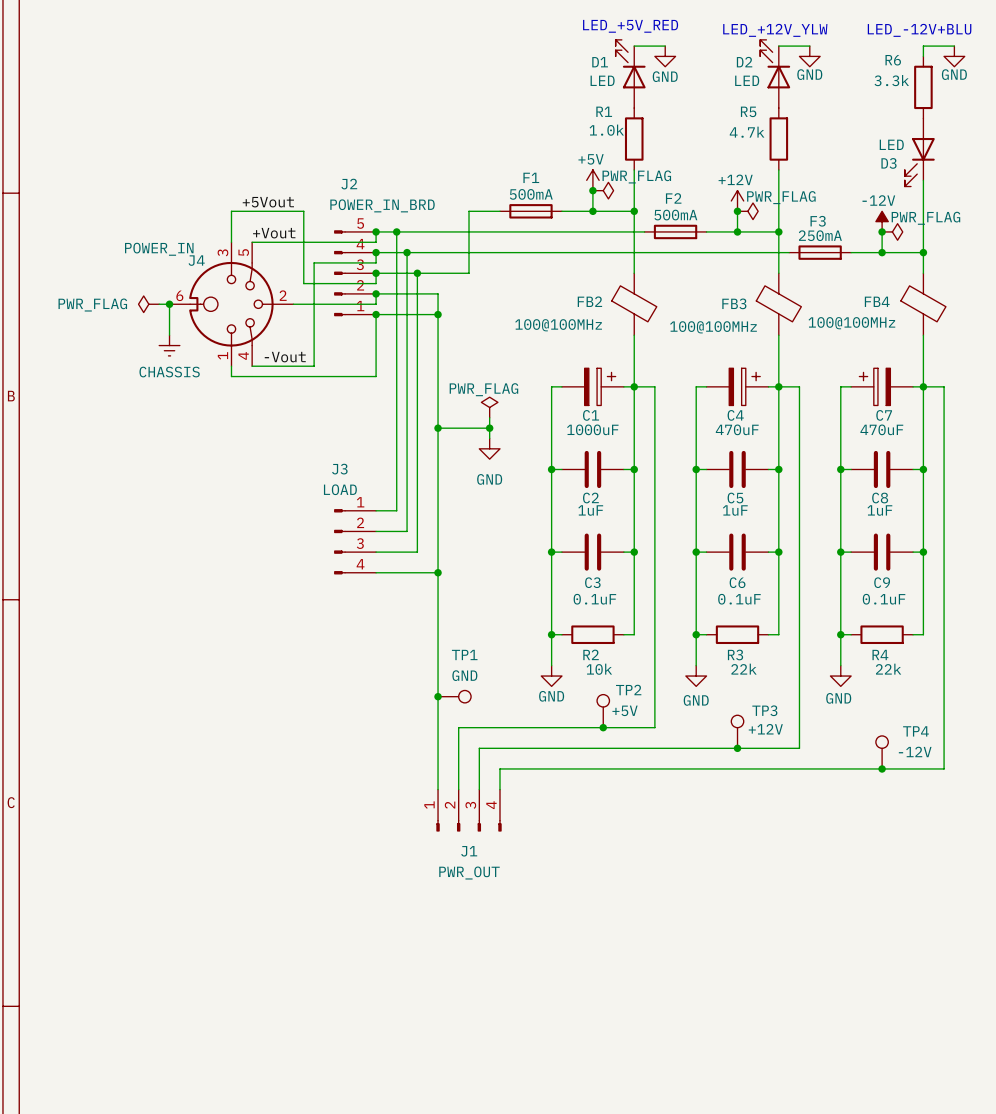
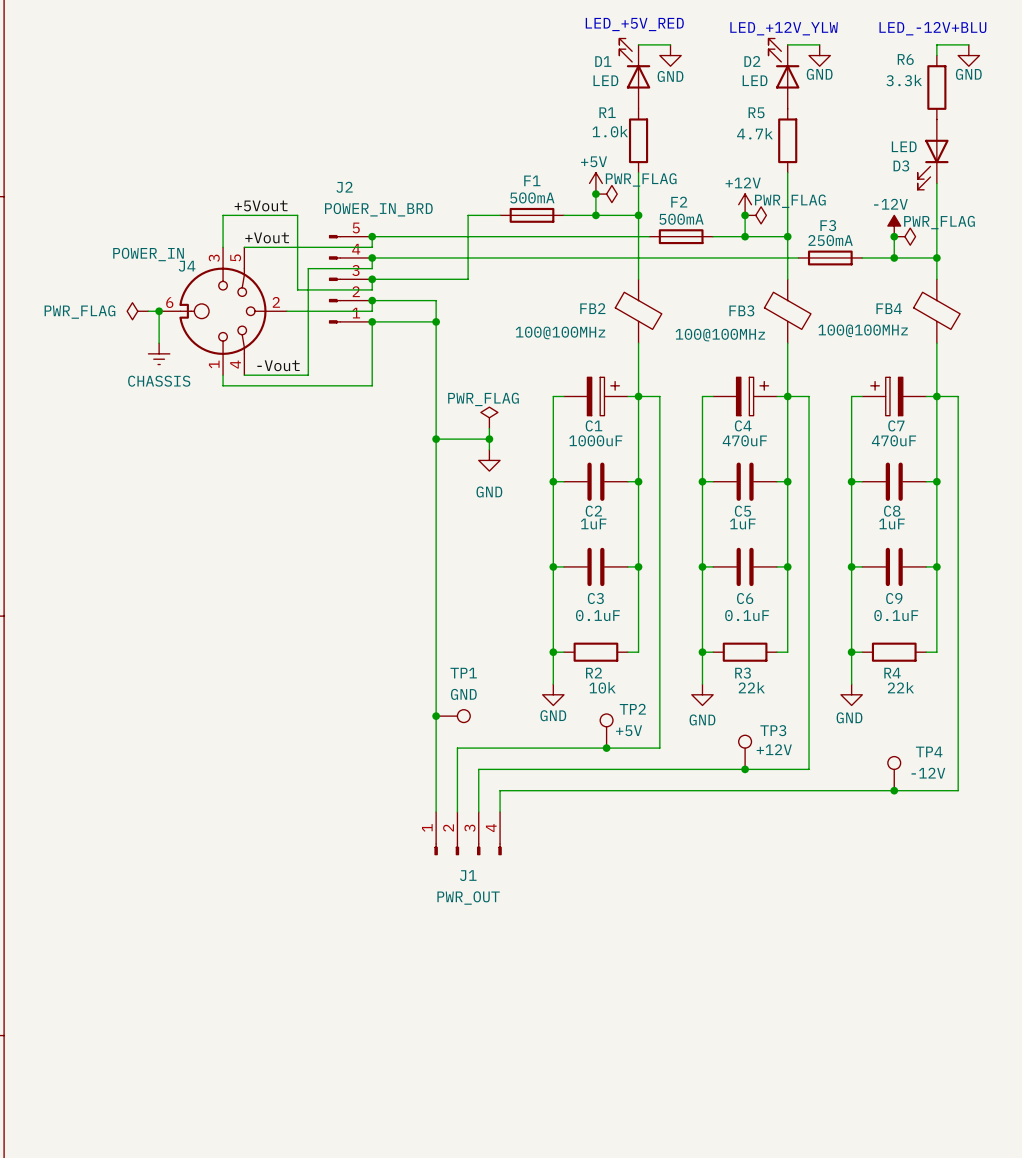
wire: (396, 231) (396, 510) (376, 510) -> none
junction: (396, 231) -> none
wire: (407, 252) (407, 531) (376, 531) -> none
junction: (407, 252) -> none
wire: (417, 273) (417, 552) (376, 552) -> none
junction: (417, 273) -> none
J3: LOAD (355, 541) -> none
wire: (376, 572) (438, 572) -> none
junction: (438, 572) -> none

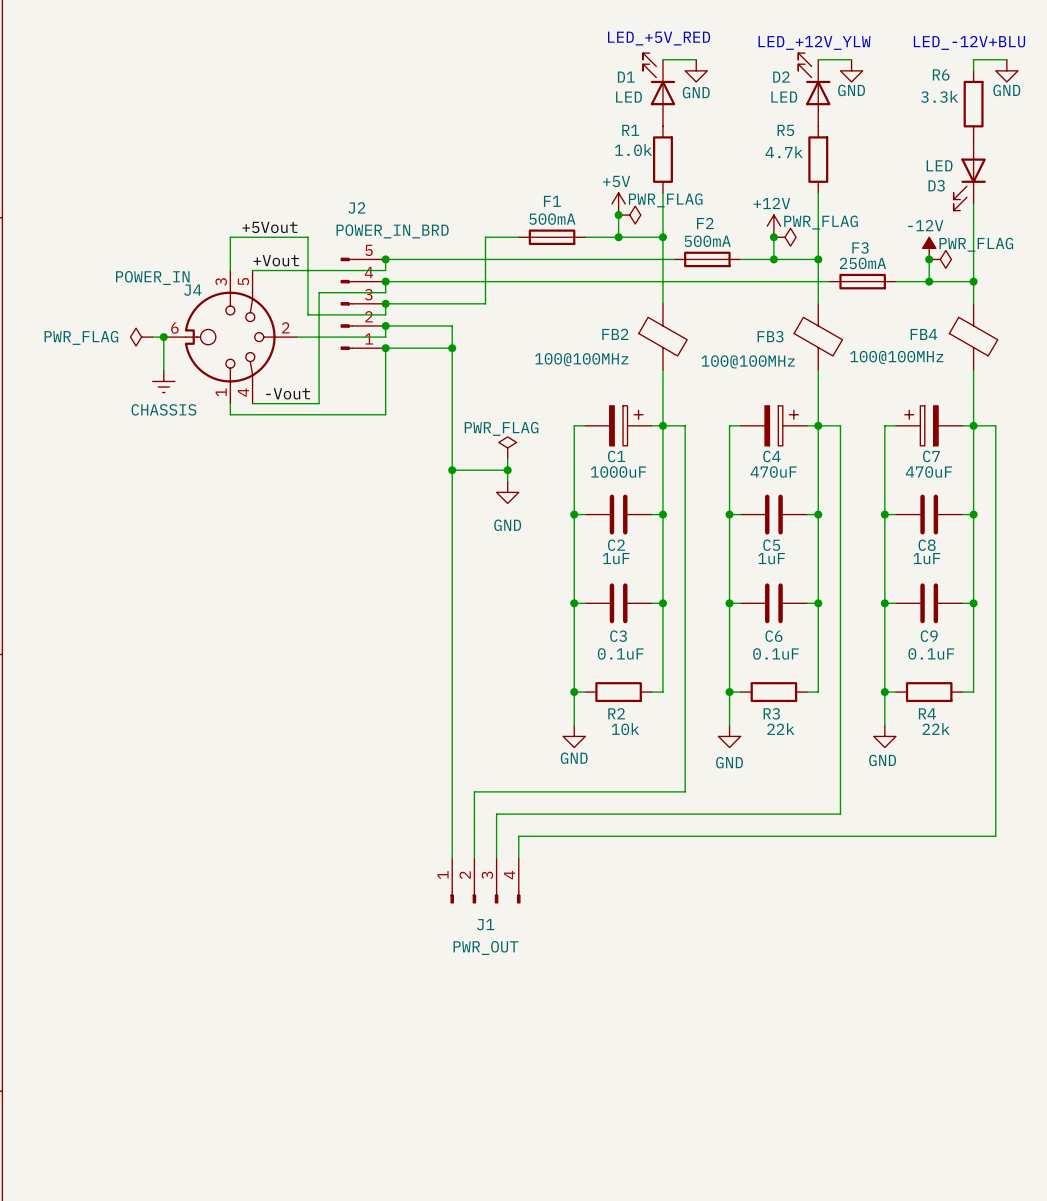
junction: (436, 716) -> none
TP1: GND (453, 716) -> none
TP2: +5V (606, 731) -> none
junction: (606, 748) -> none
TP3: +12V (745, 752) -> none
junction: (745, 769) -> none
TP4: -12V (894, 773) -> none
junction: (894, 790) -> none

